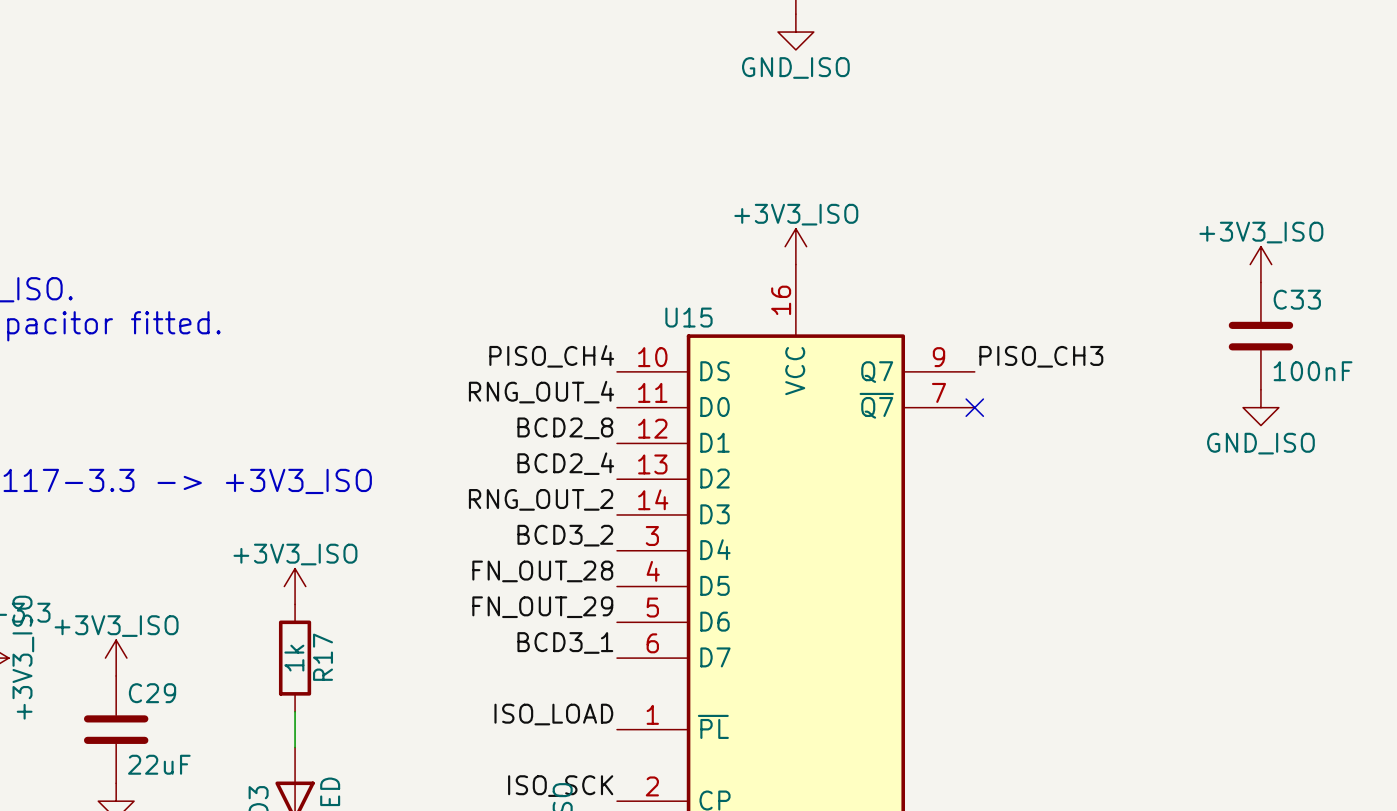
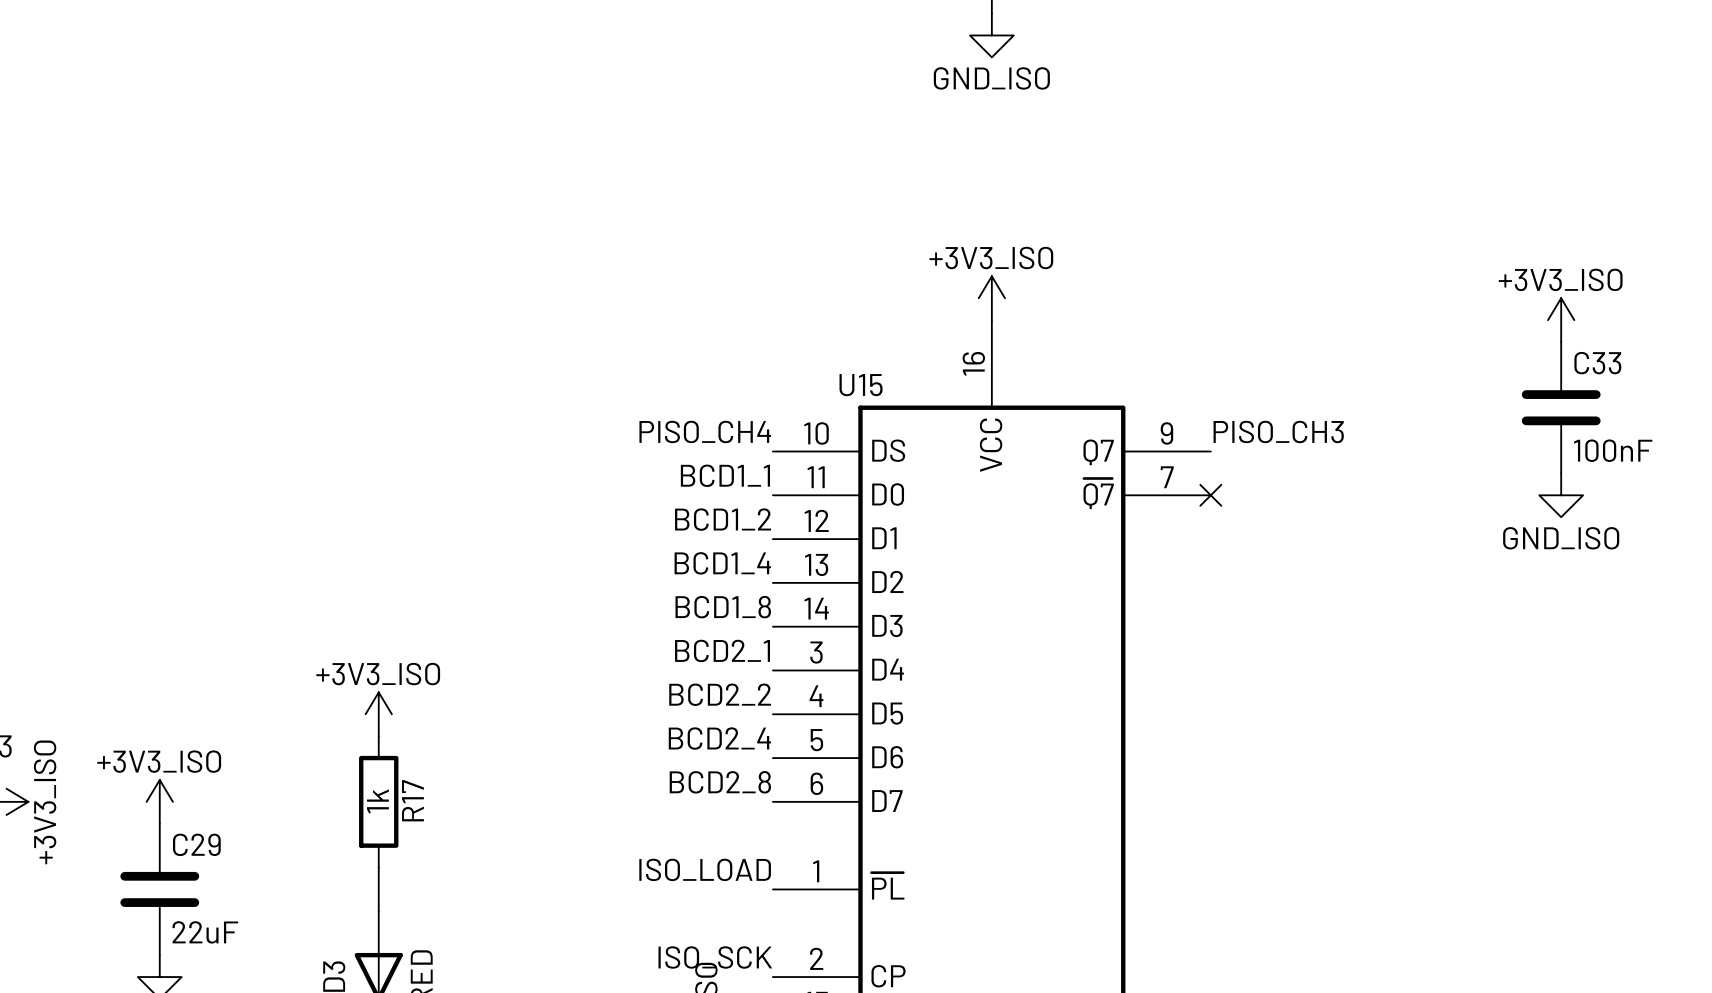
label: RNG_OUT_4 (541, 392) -> BCD1_1 (725, 475)
label: BCD2_8 (565, 428) -> BCD1_2 (723, 519)
label: BCD2_4 (565, 463) -> BCD1_4 (722, 563)
label: RNG_OUT_2 (541, 499) -> BCD1_8 (723, 607)
label: BCD3_2 (565, 535) -> BCD2_1 (722, 650)
label: FN_OUT_28 (542, 571) -> BCD2_2 (720, 694)
label: FN_OUT_29 (542, 607) -> BCD2_4 (719, 738)
label: BCD3_1 (565, 642) -> BCD2_8 (720, 782)

